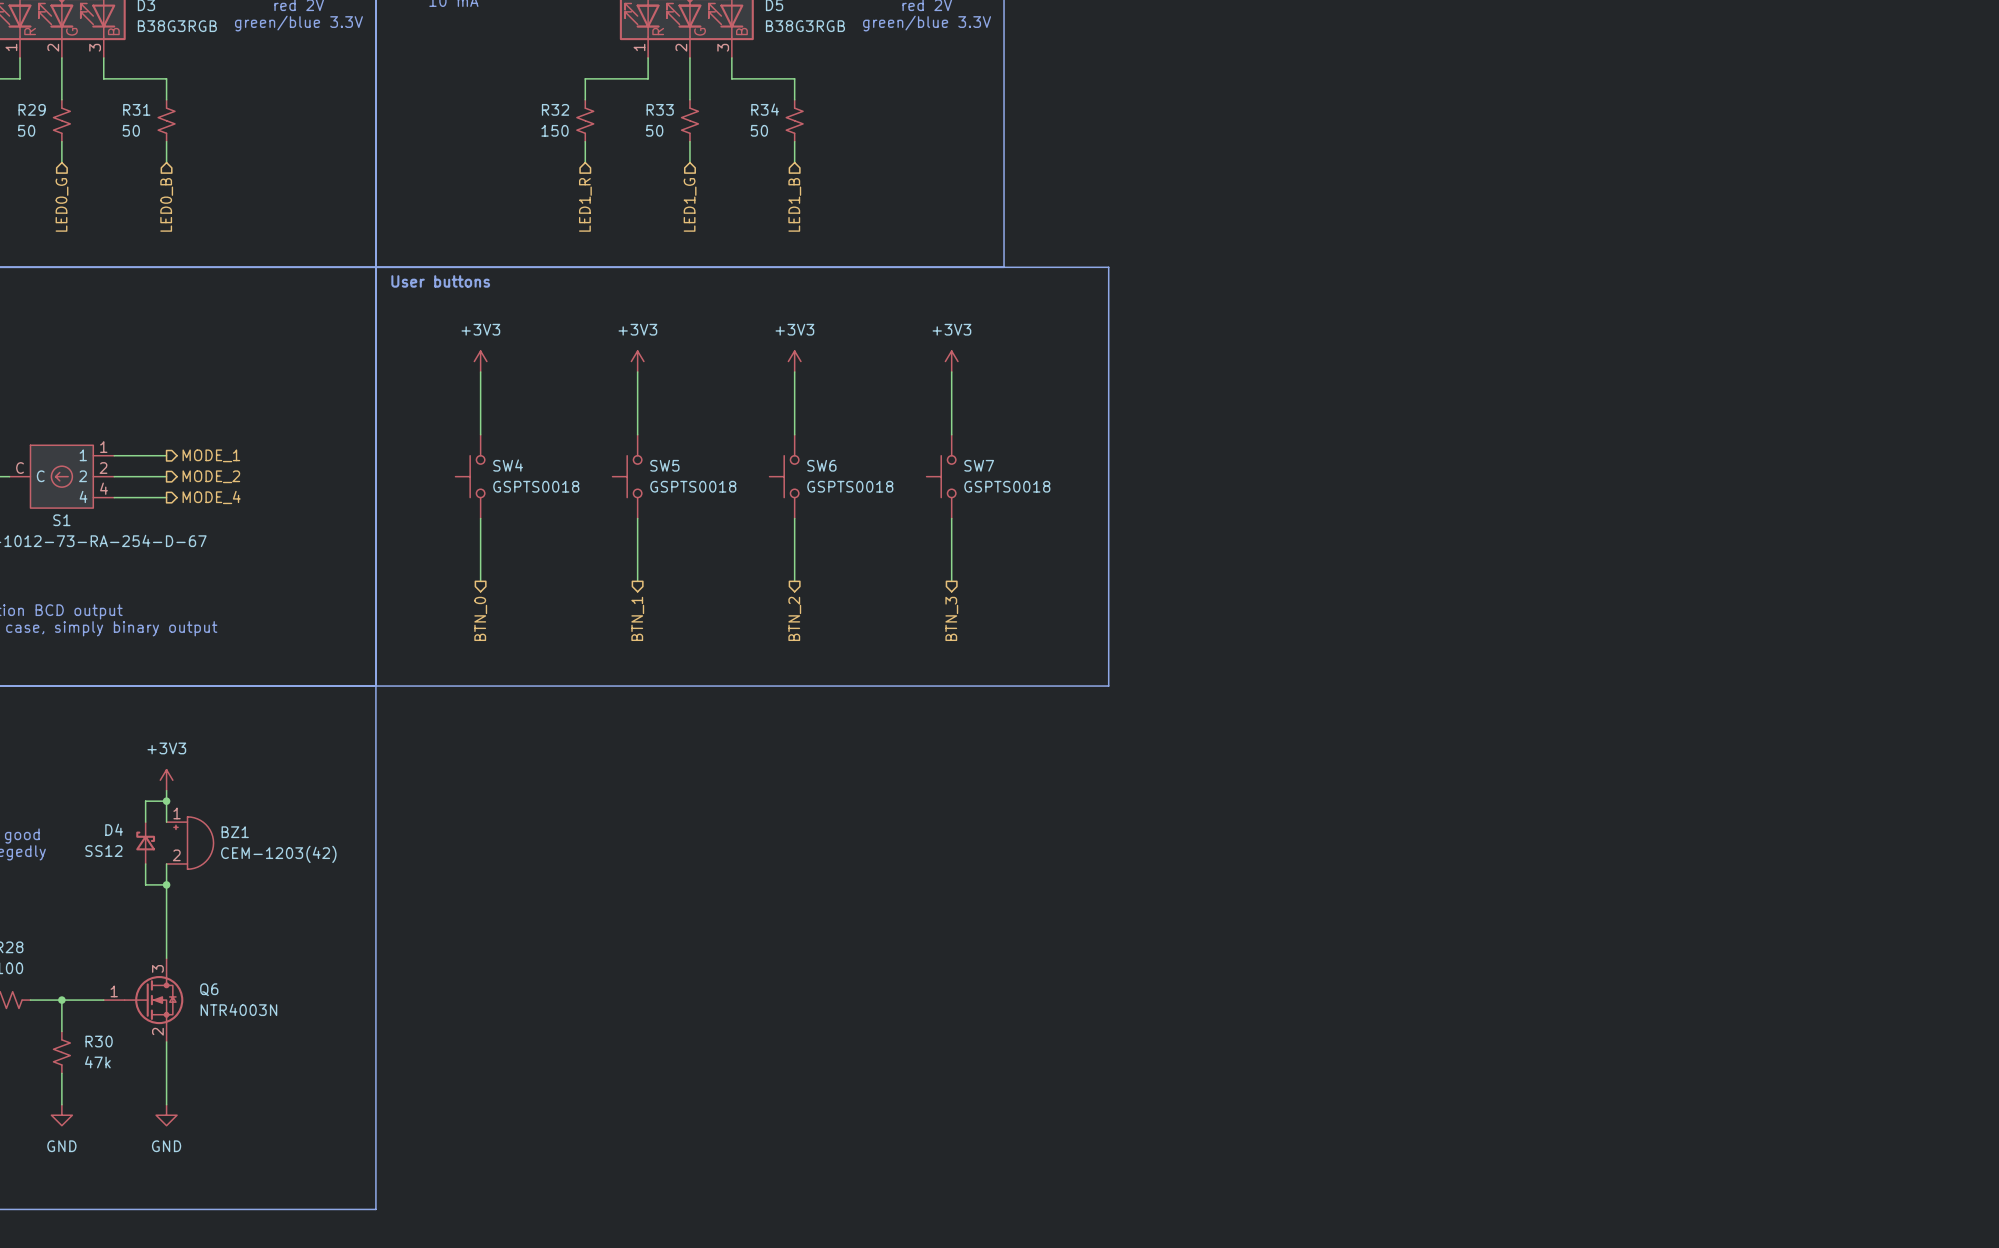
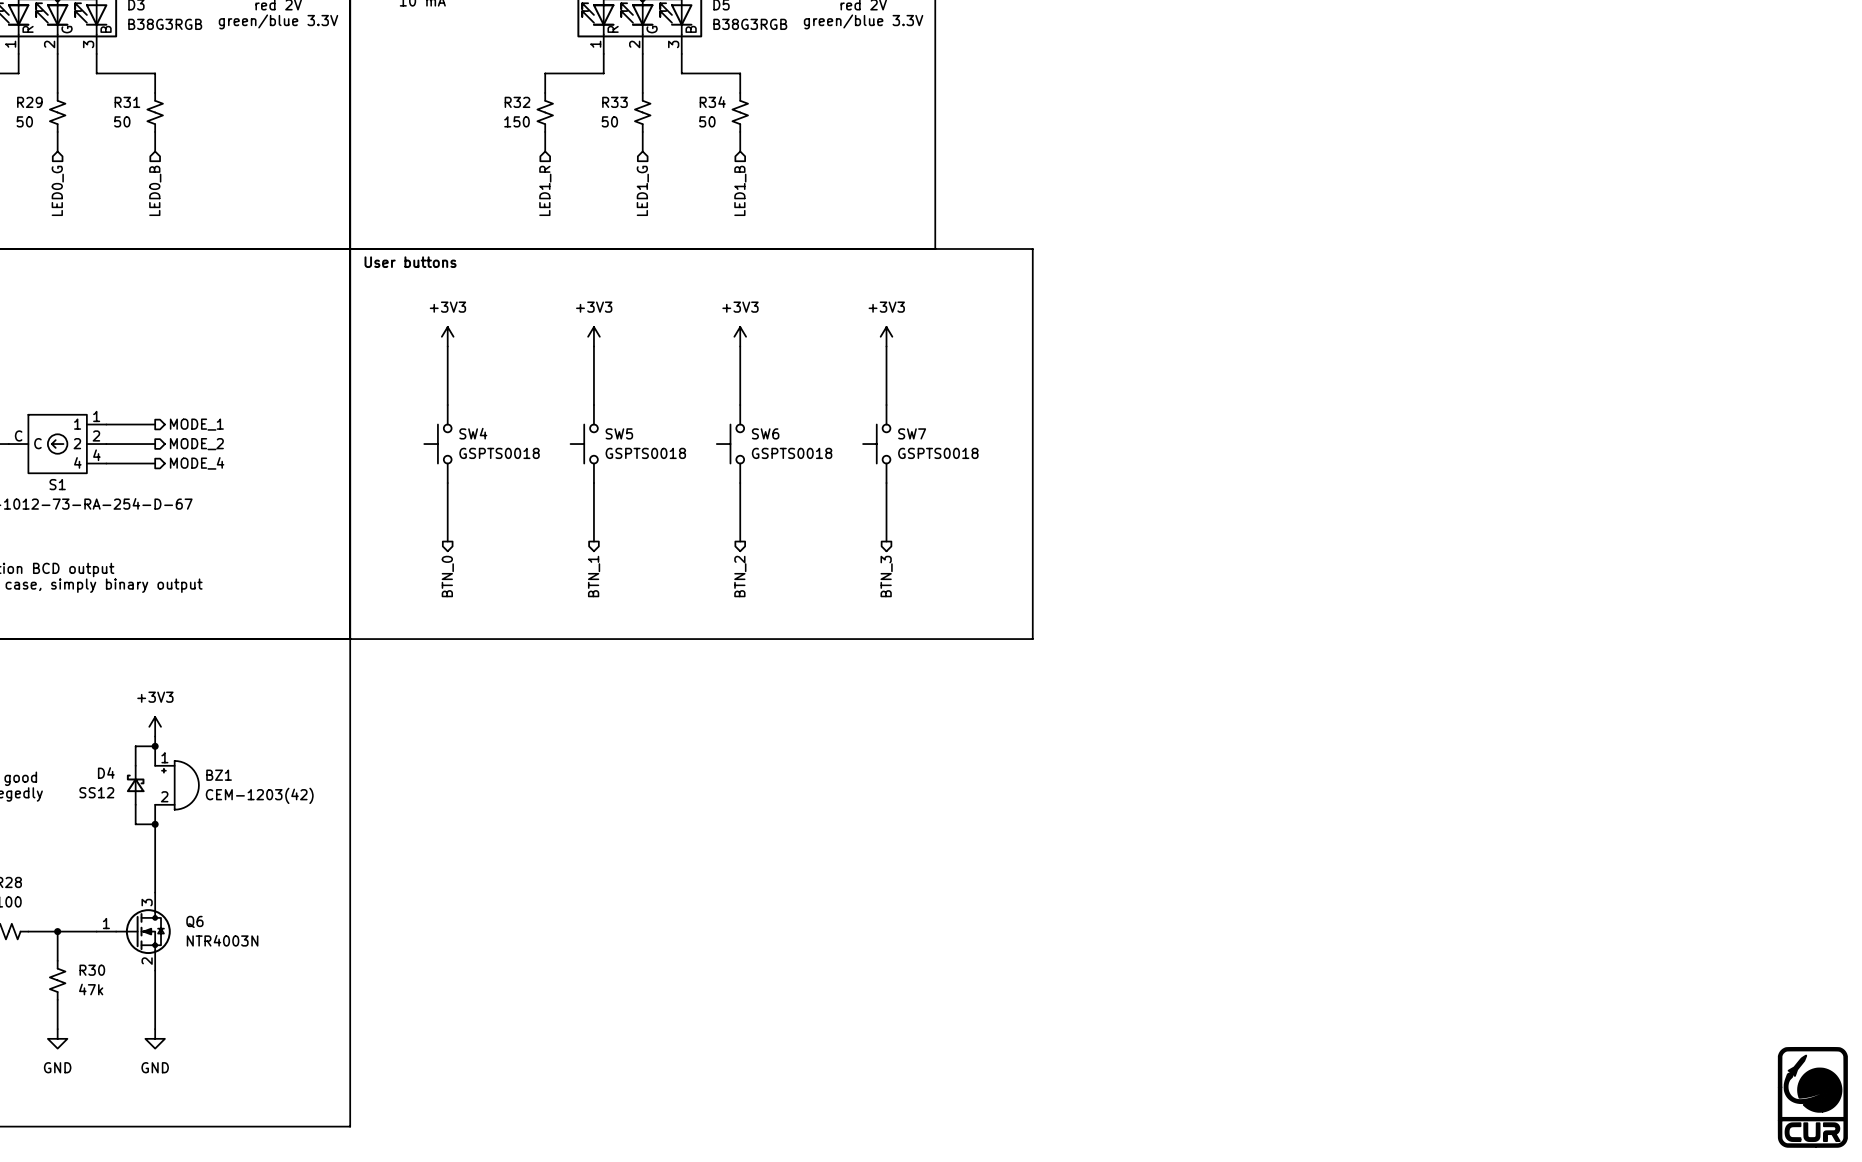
power symbol: none -> (1812, 1097)

